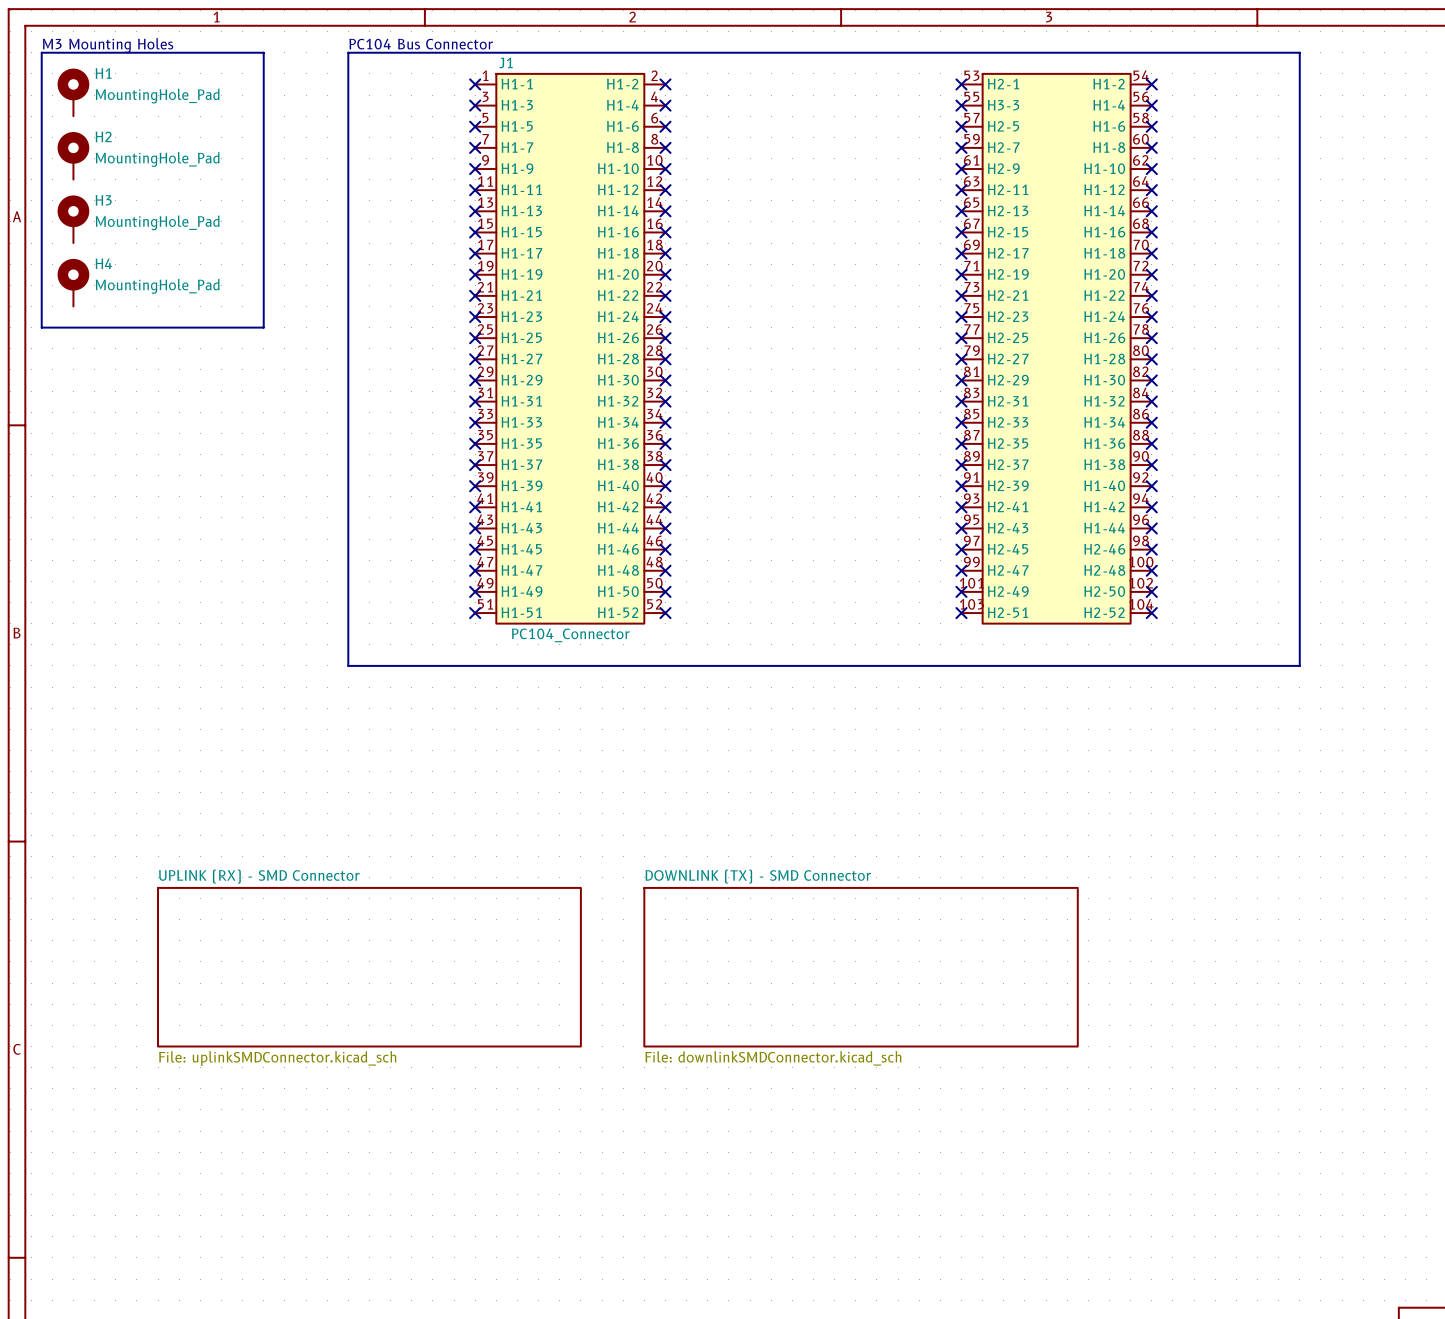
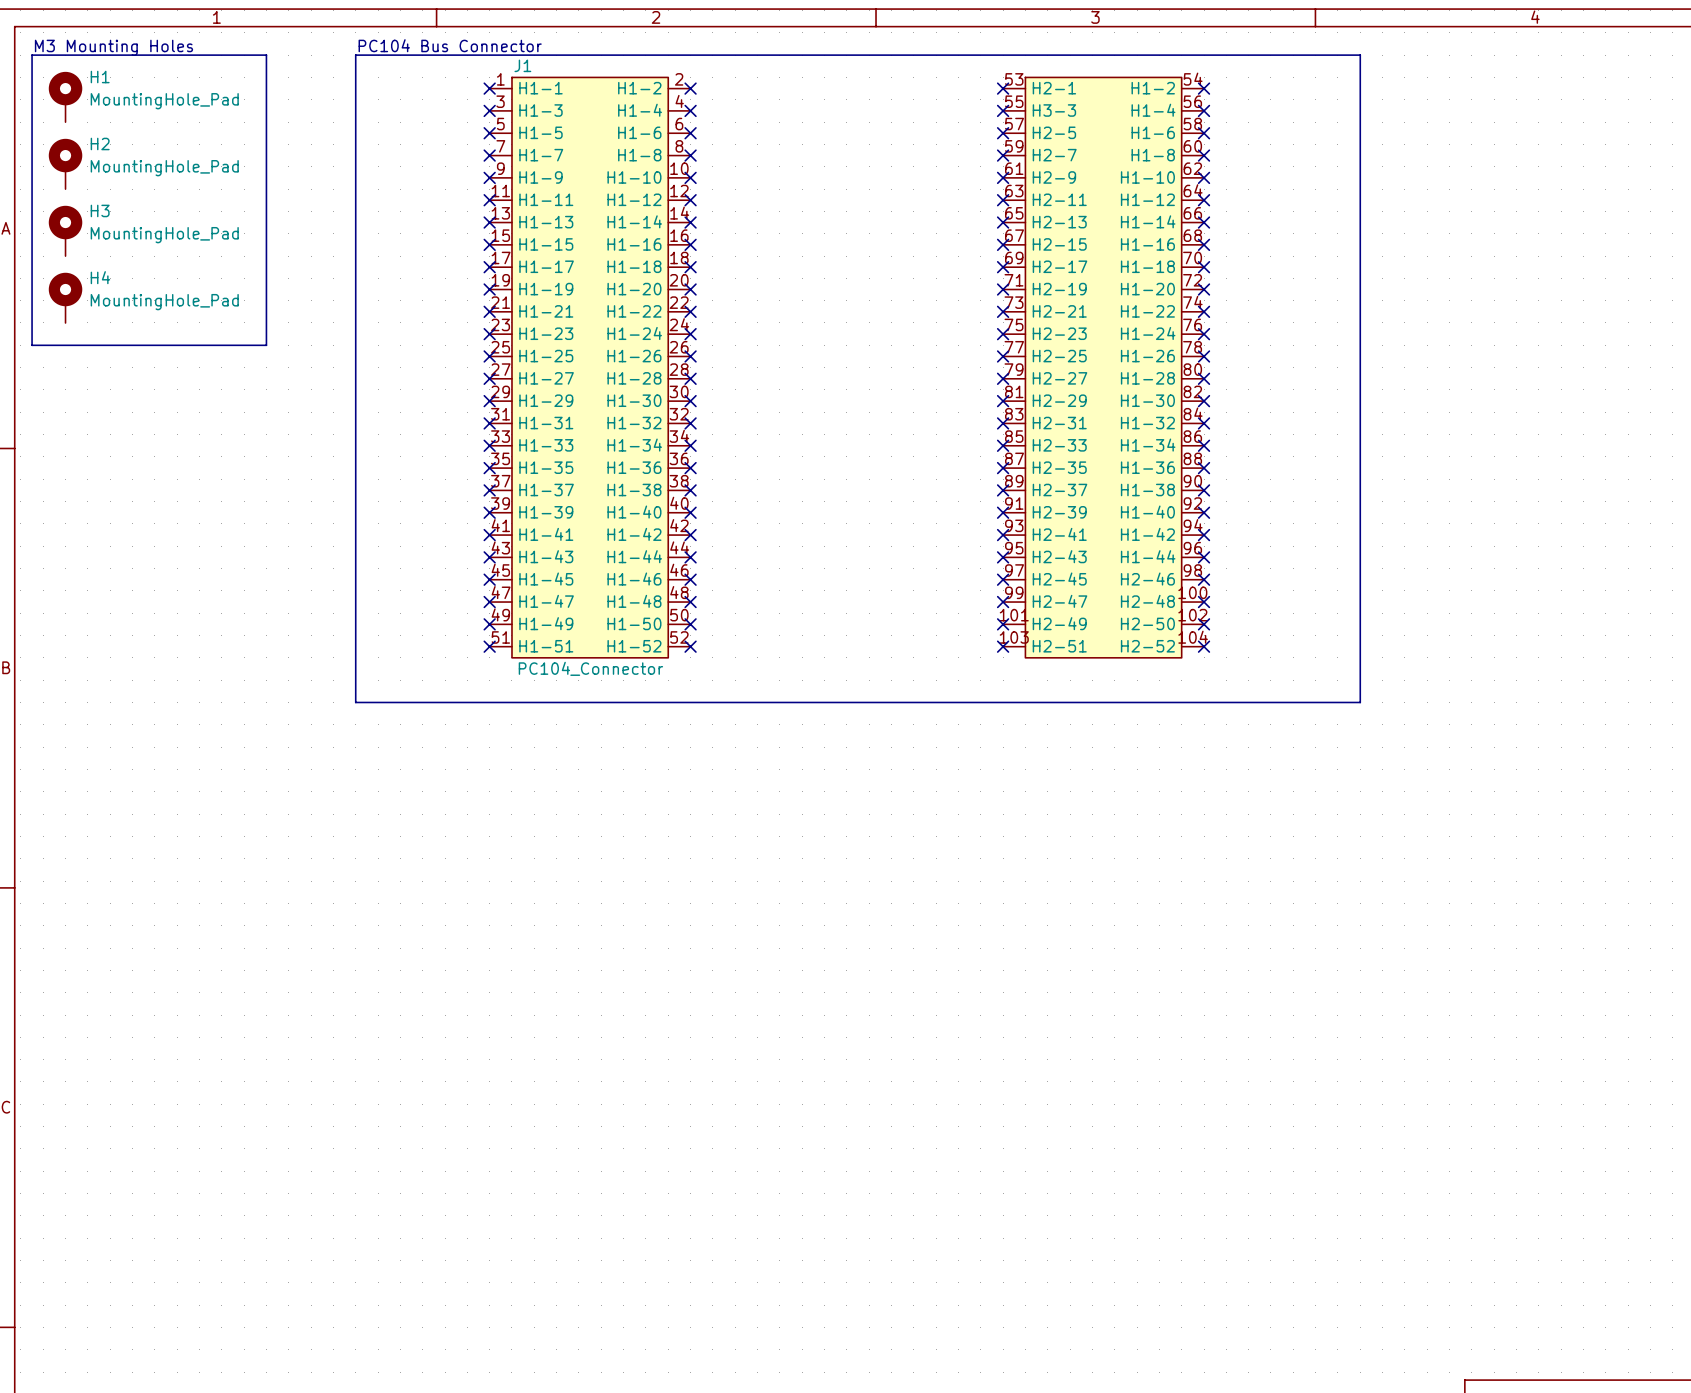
sheet UPLINK (RX) - SMD Connector: File: uplinkSMDConnector.kicad_sch (369, 967) -> none
sheet DOWNLINK (TX) - SMD Connector: File: downlinkSMDConnector.kicad_sch (861, 967) -> none

